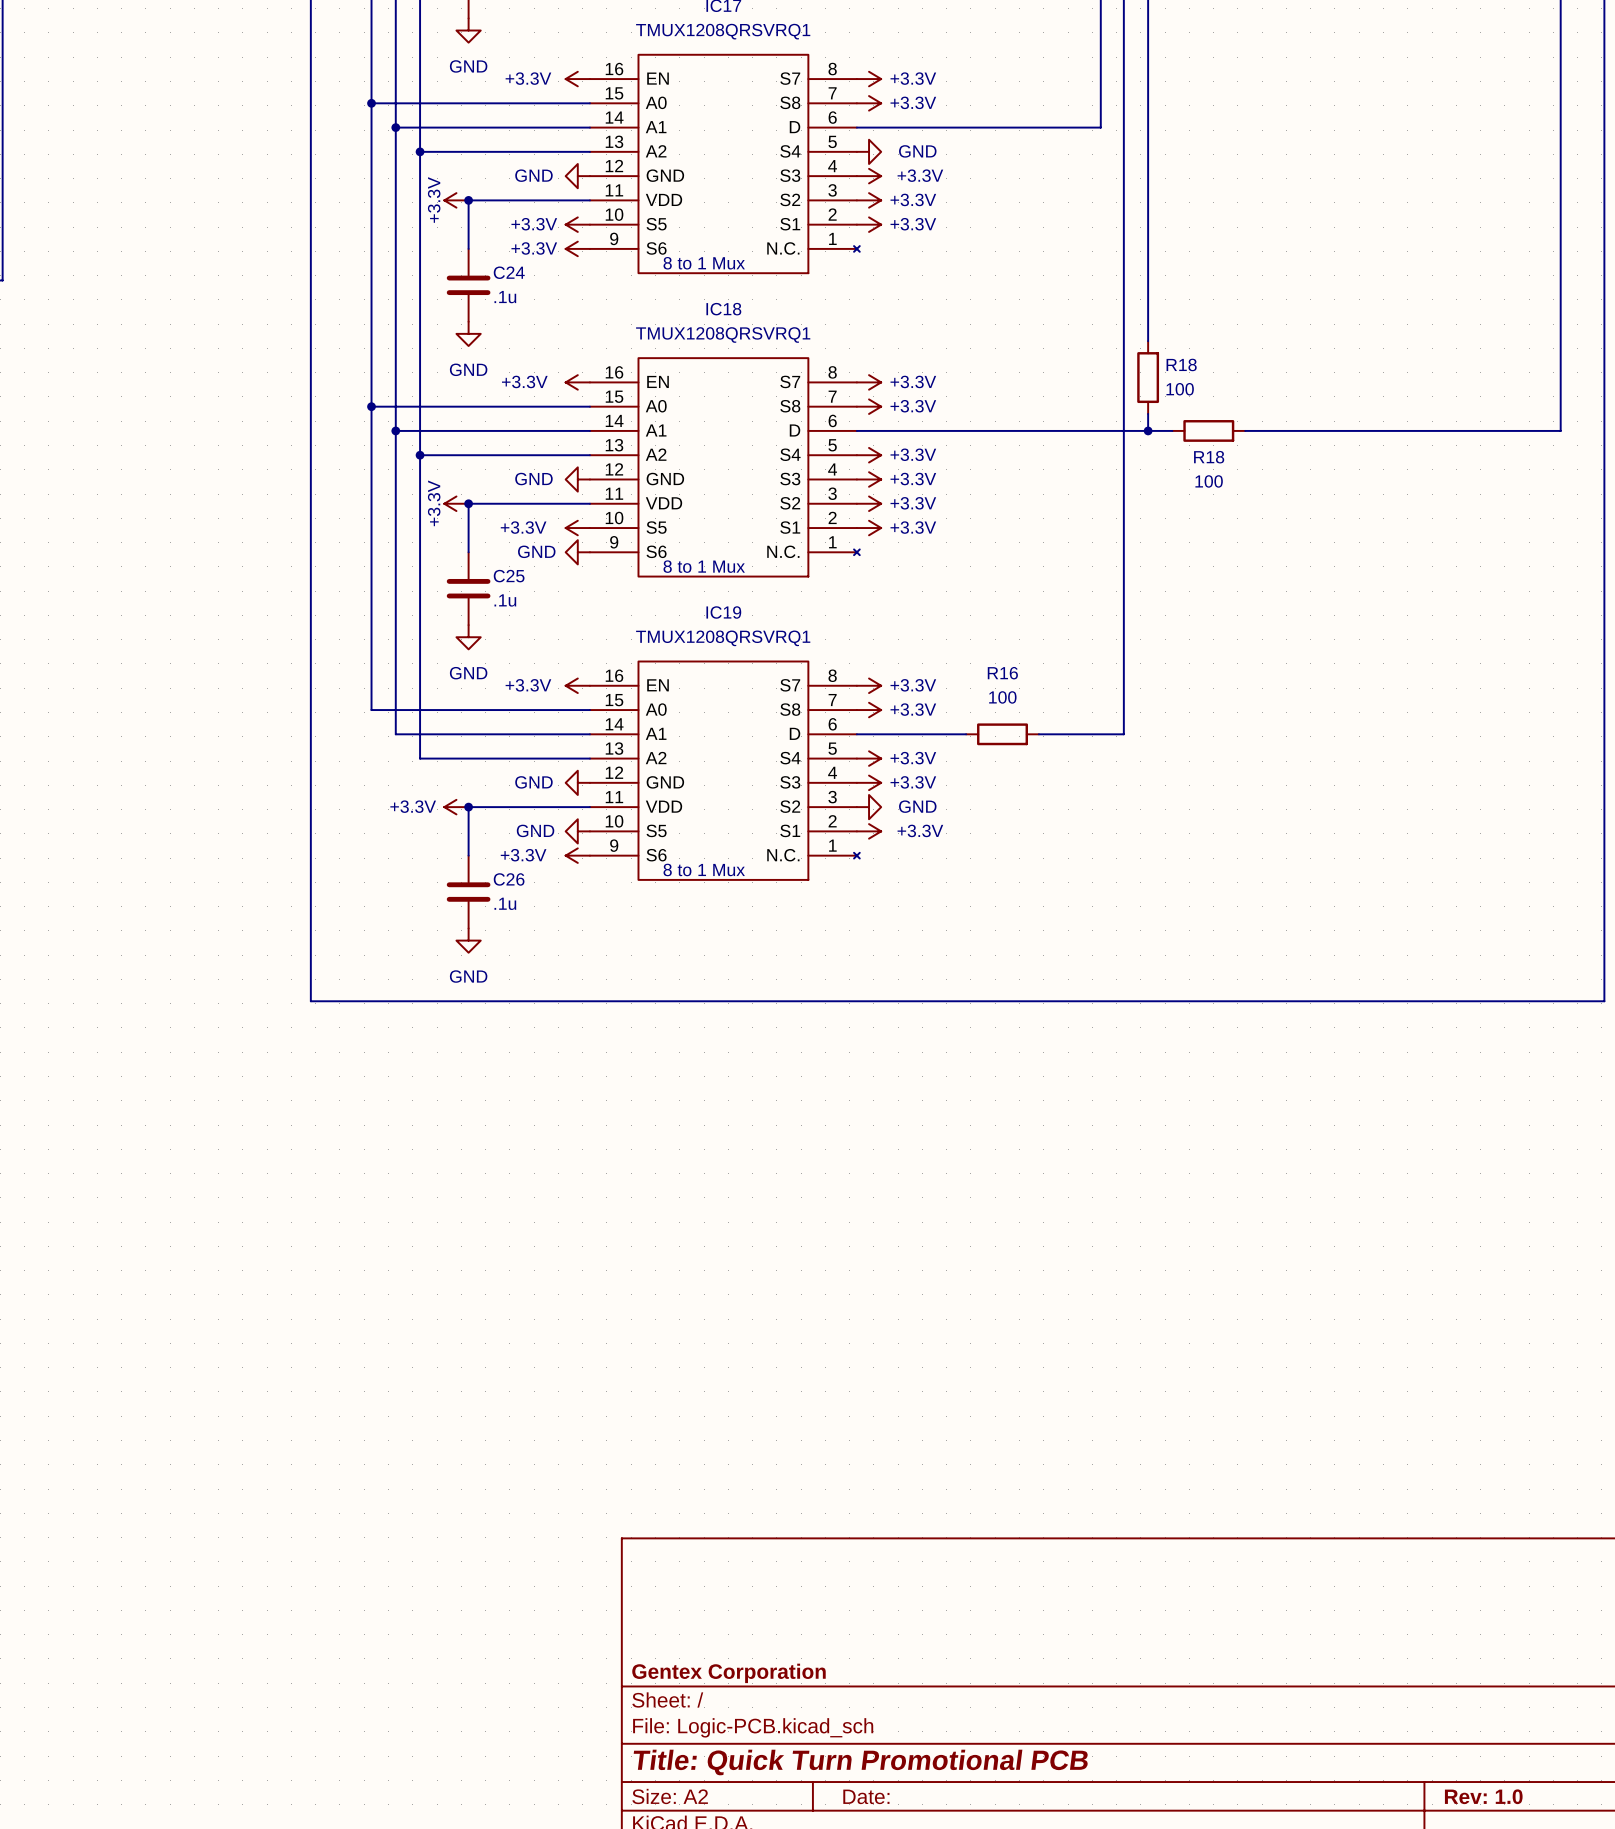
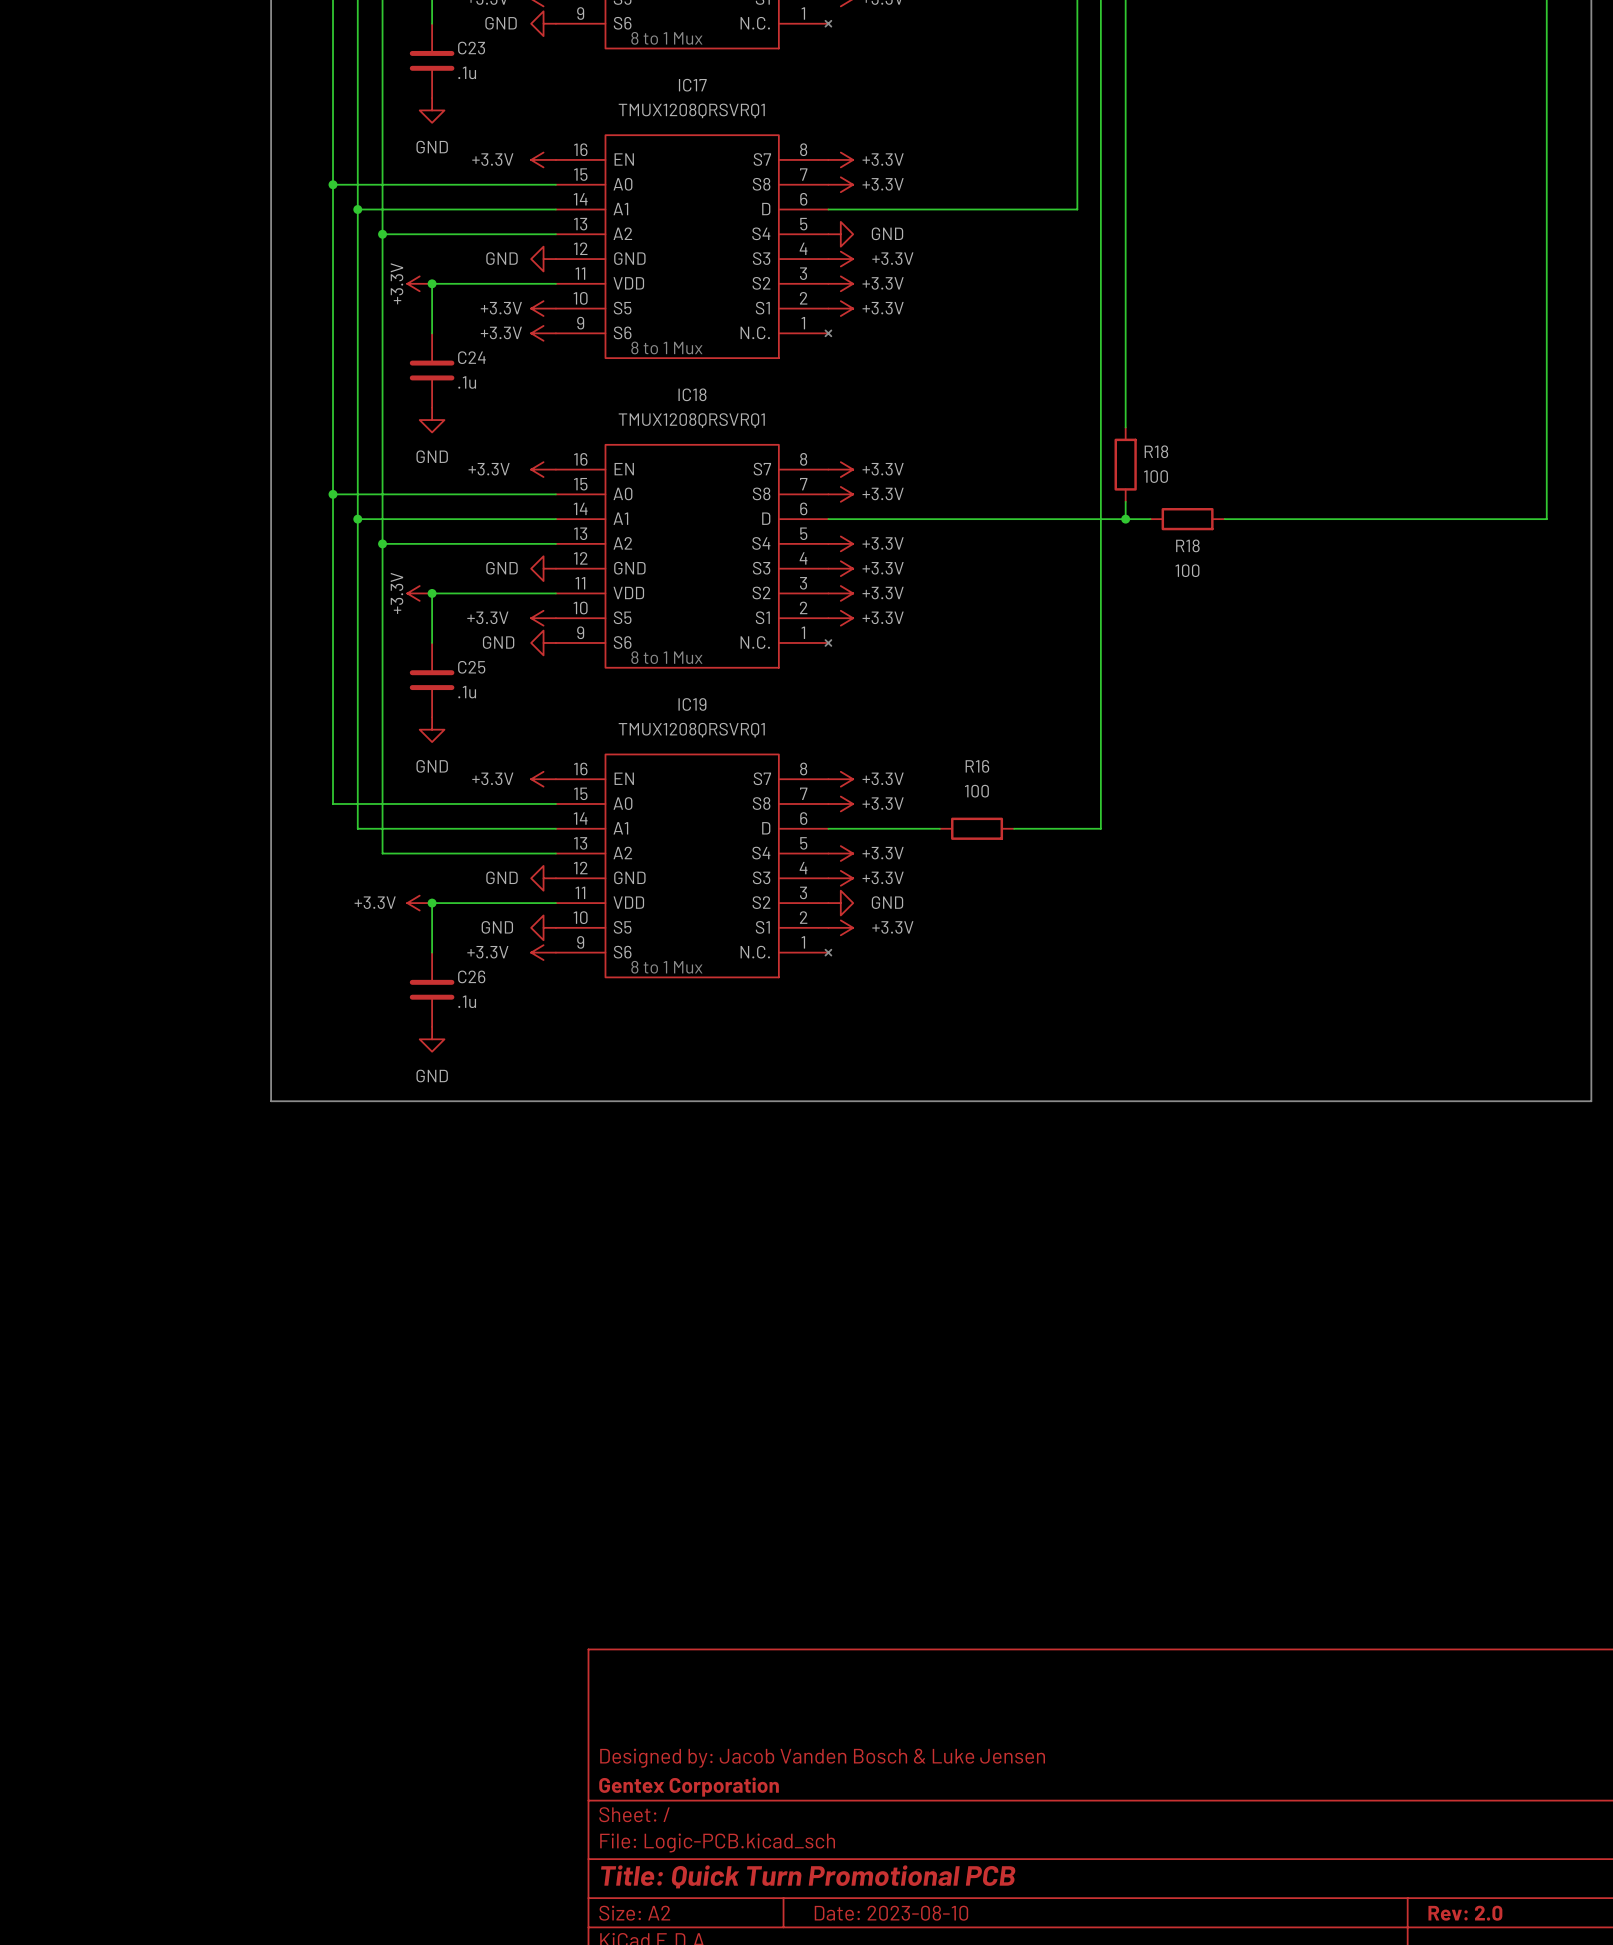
title block: none -> Designed by: Jacob Vanden Bosch & Luke Jensen (822, 1758)
title block: Date: (866, 1796) -> Date: 2023-08-10 (891, 1913)
title block: Rev: 1.0 (1483, 1796) -> Rev: 2.0 (1465, 1913)

